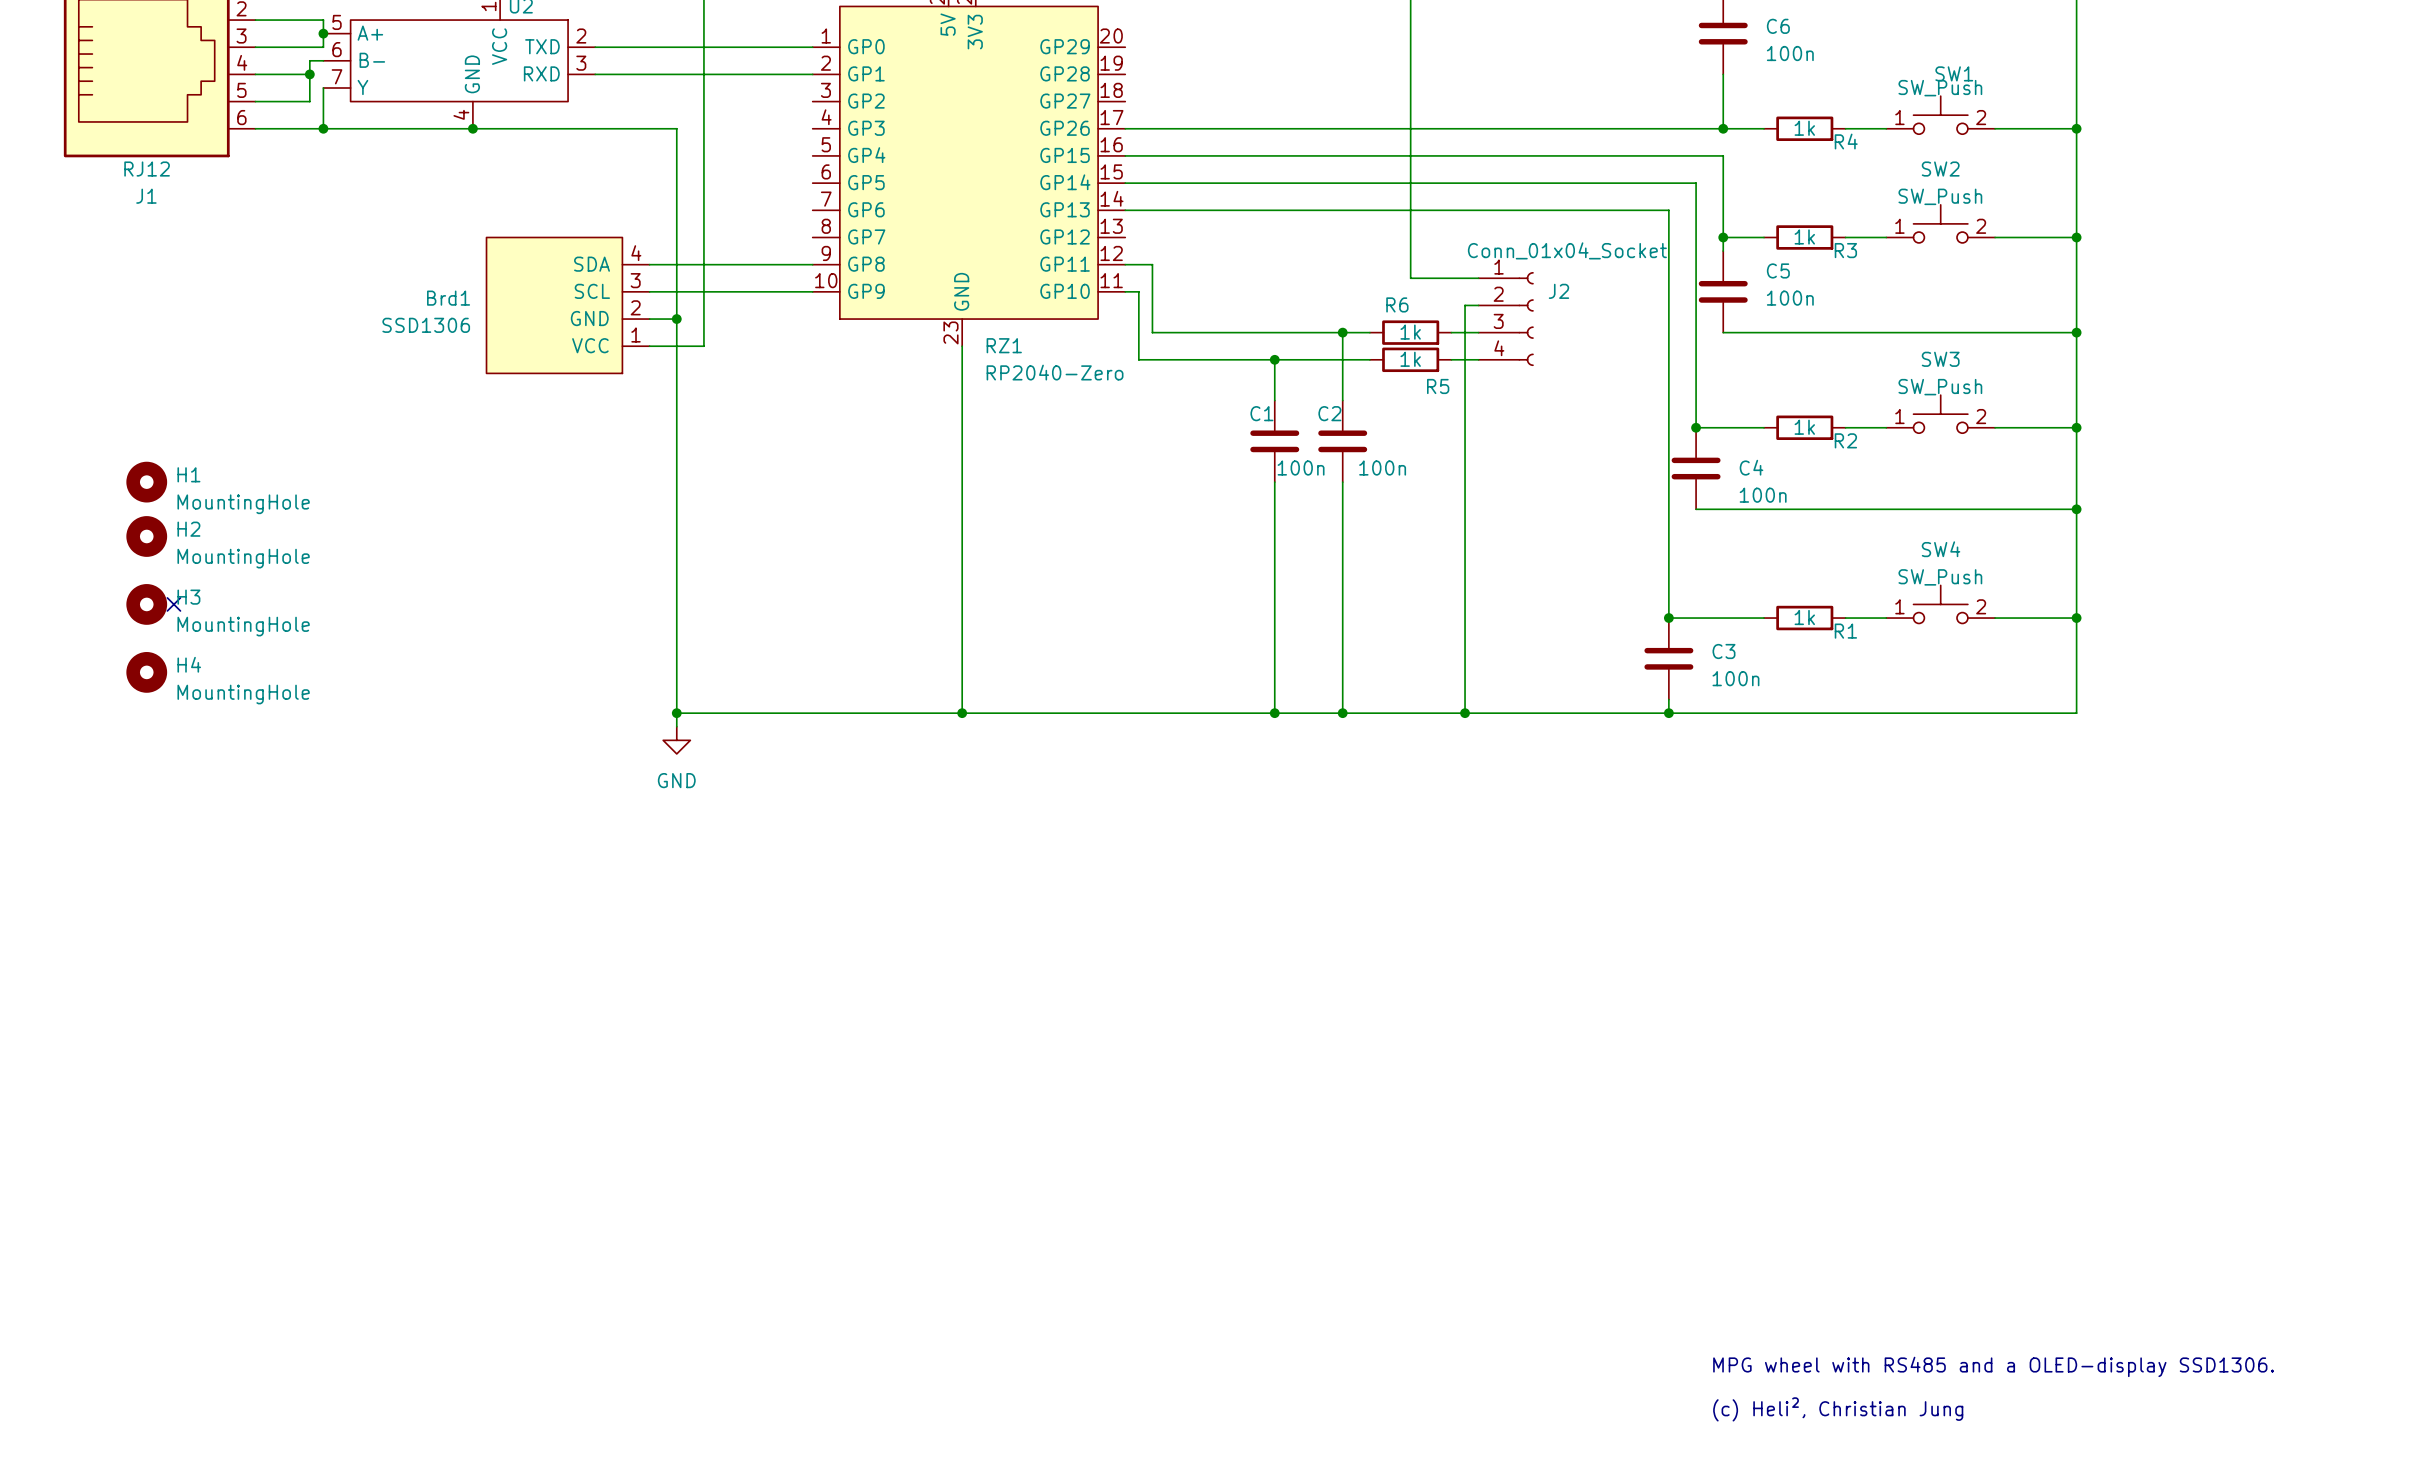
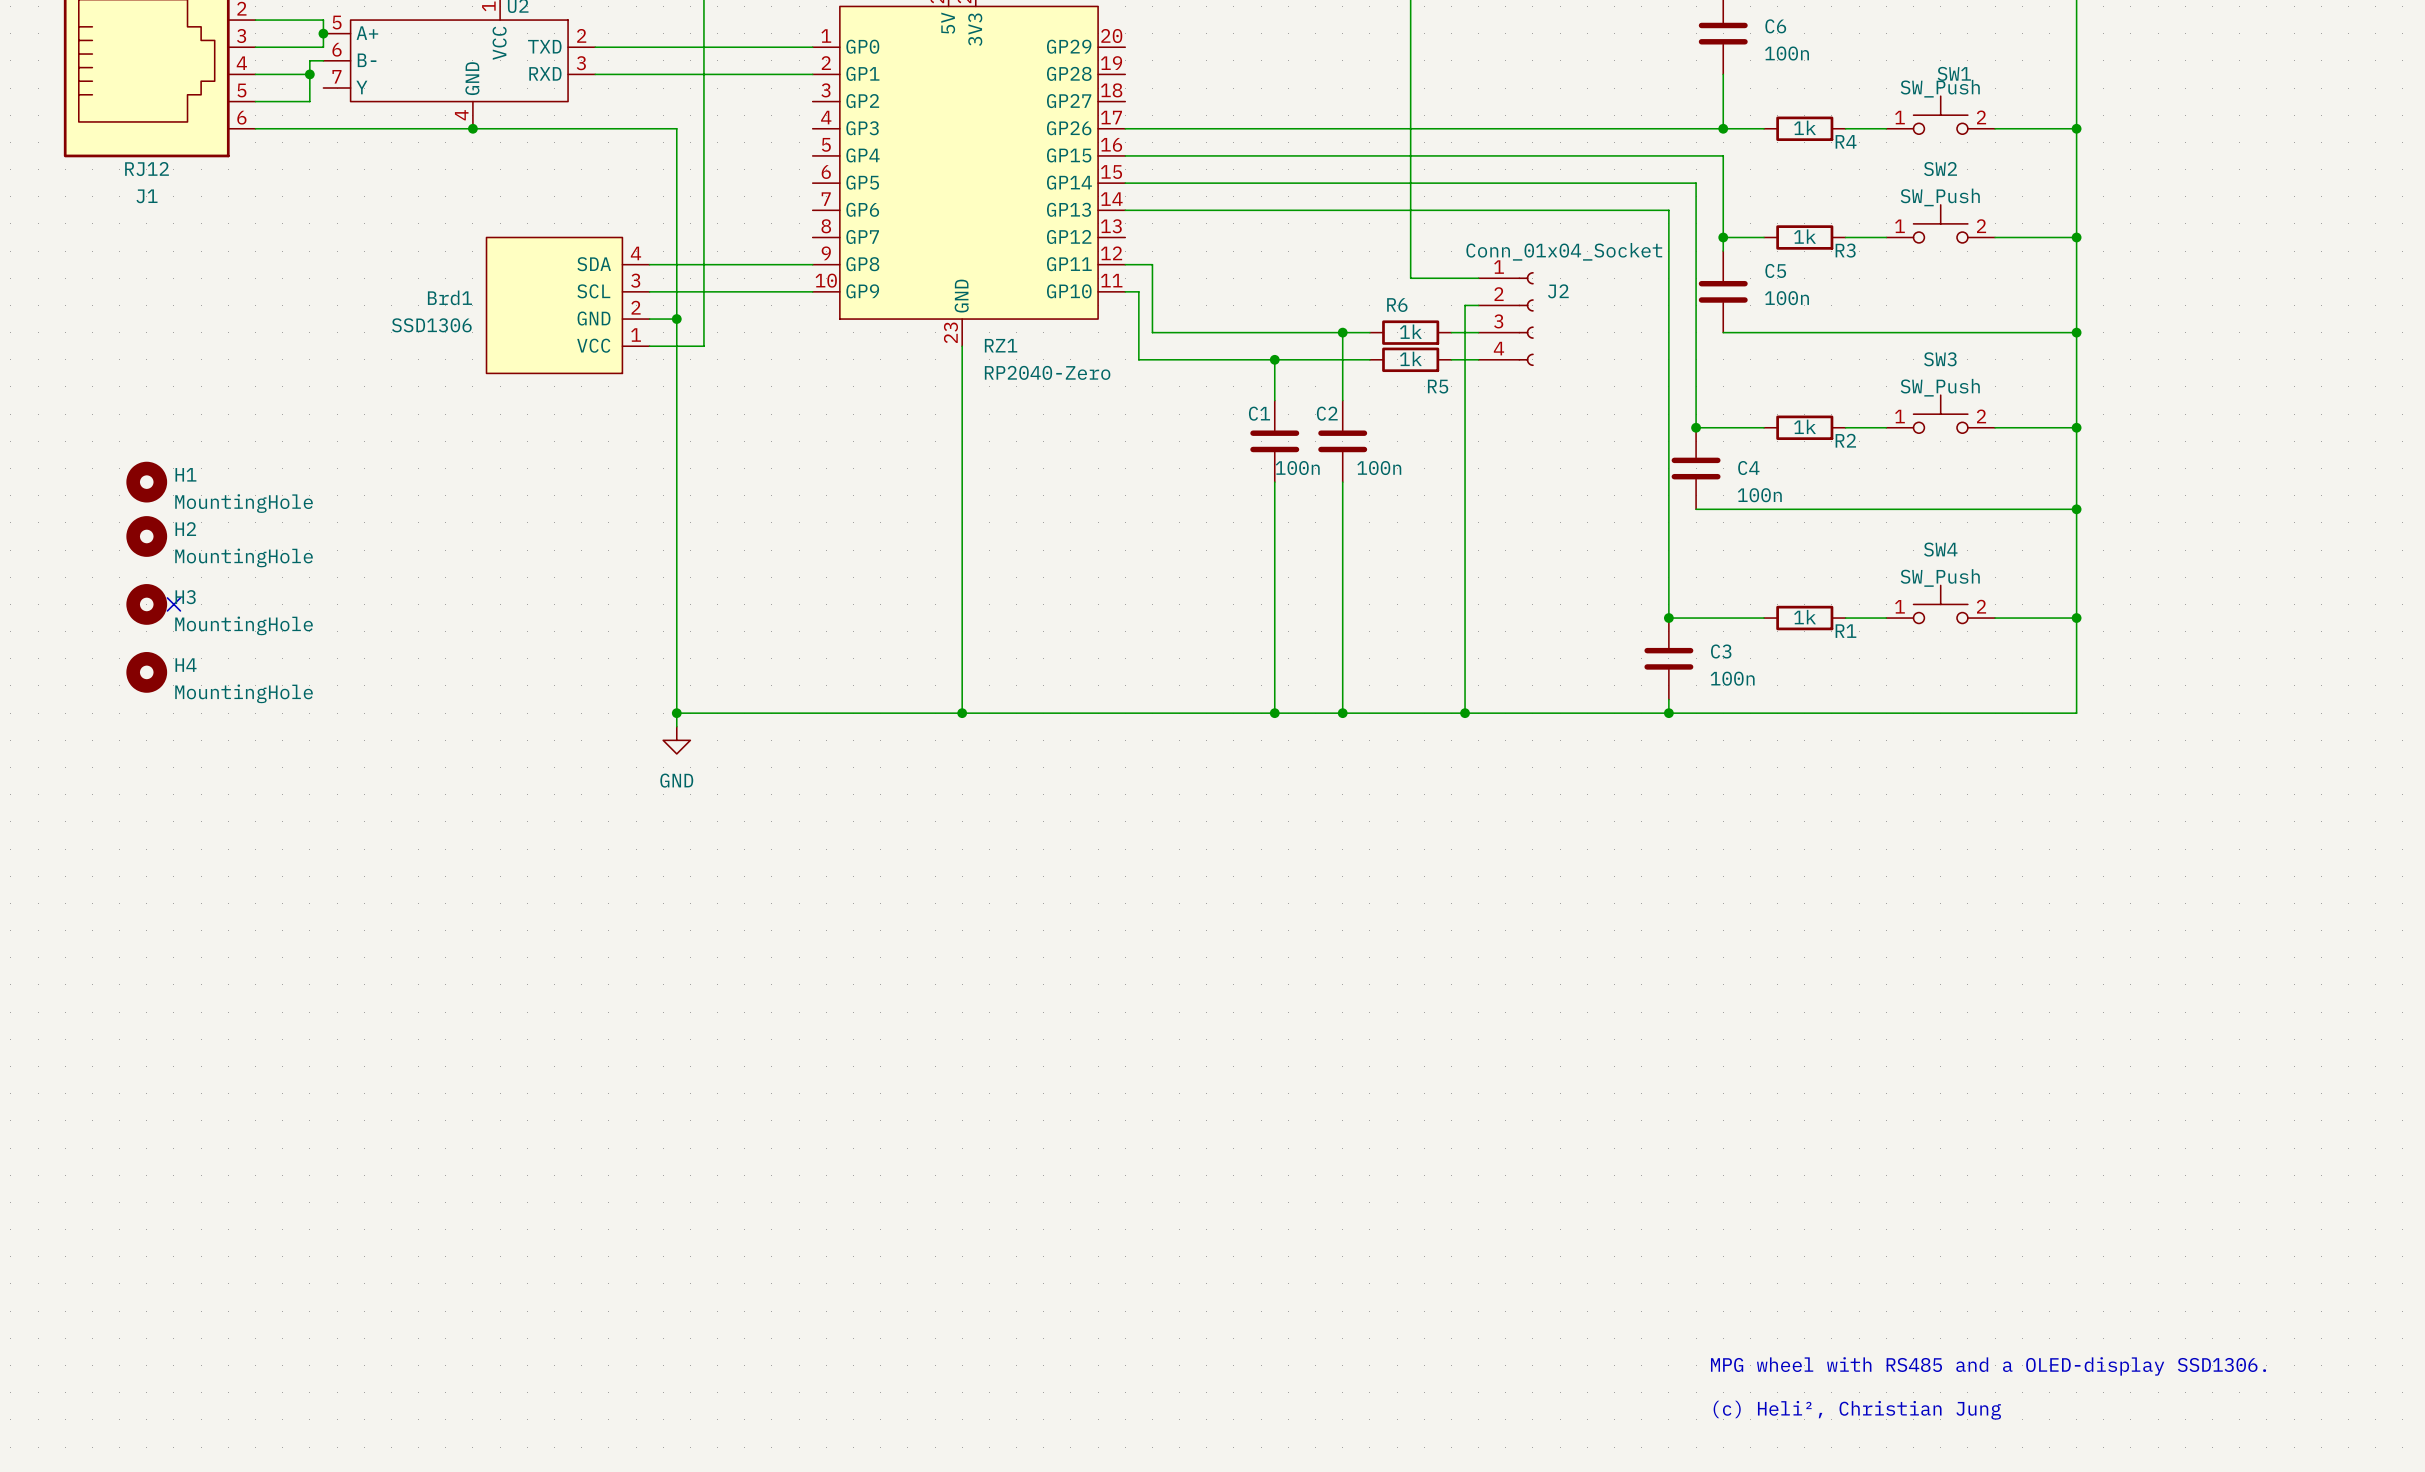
wire: (323, 88) (323, 128) -> none
junction: (323, 128) -> none

